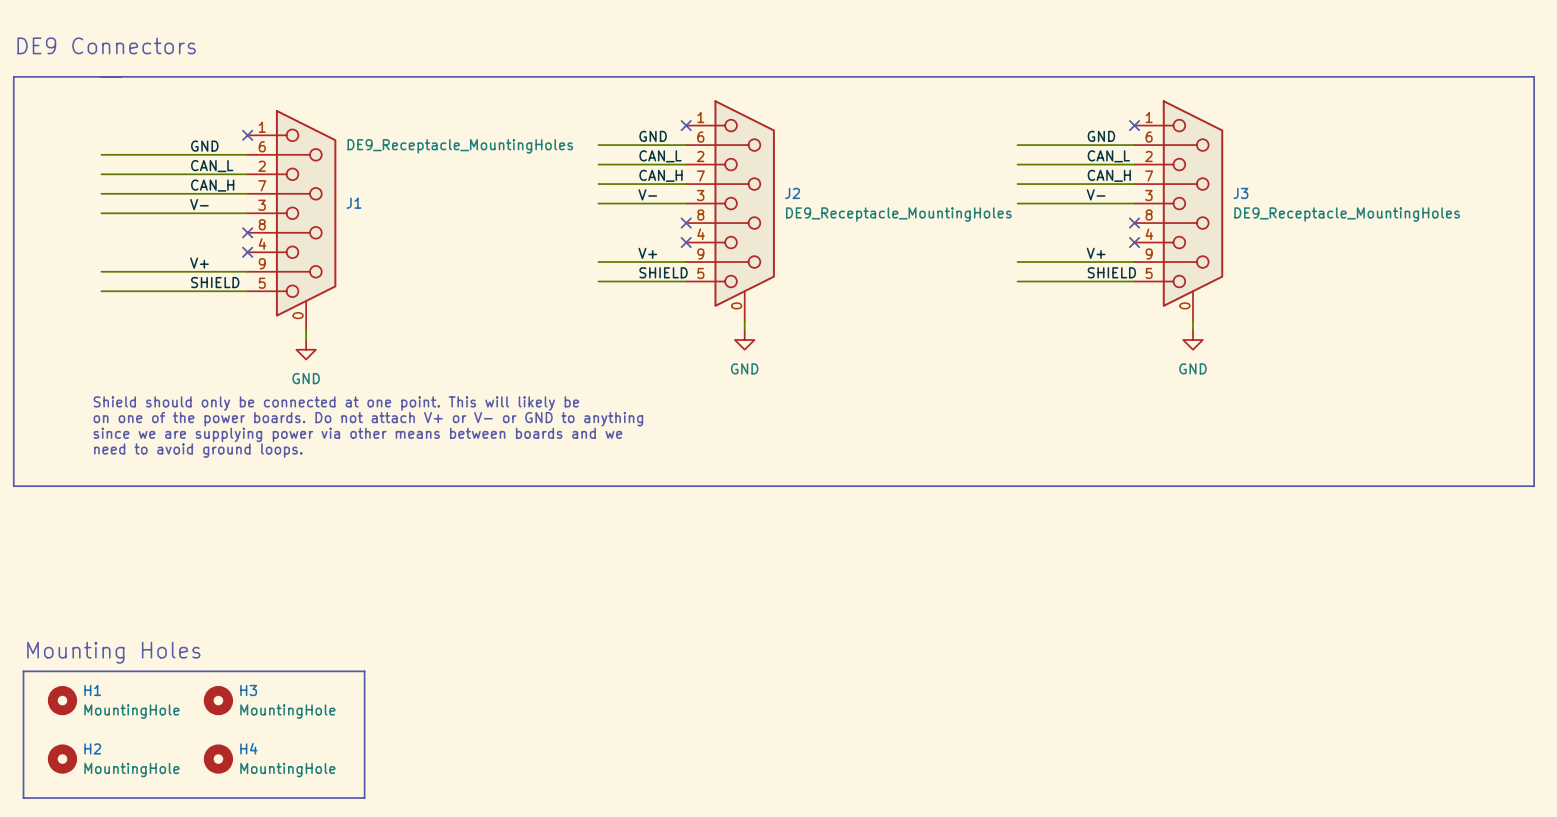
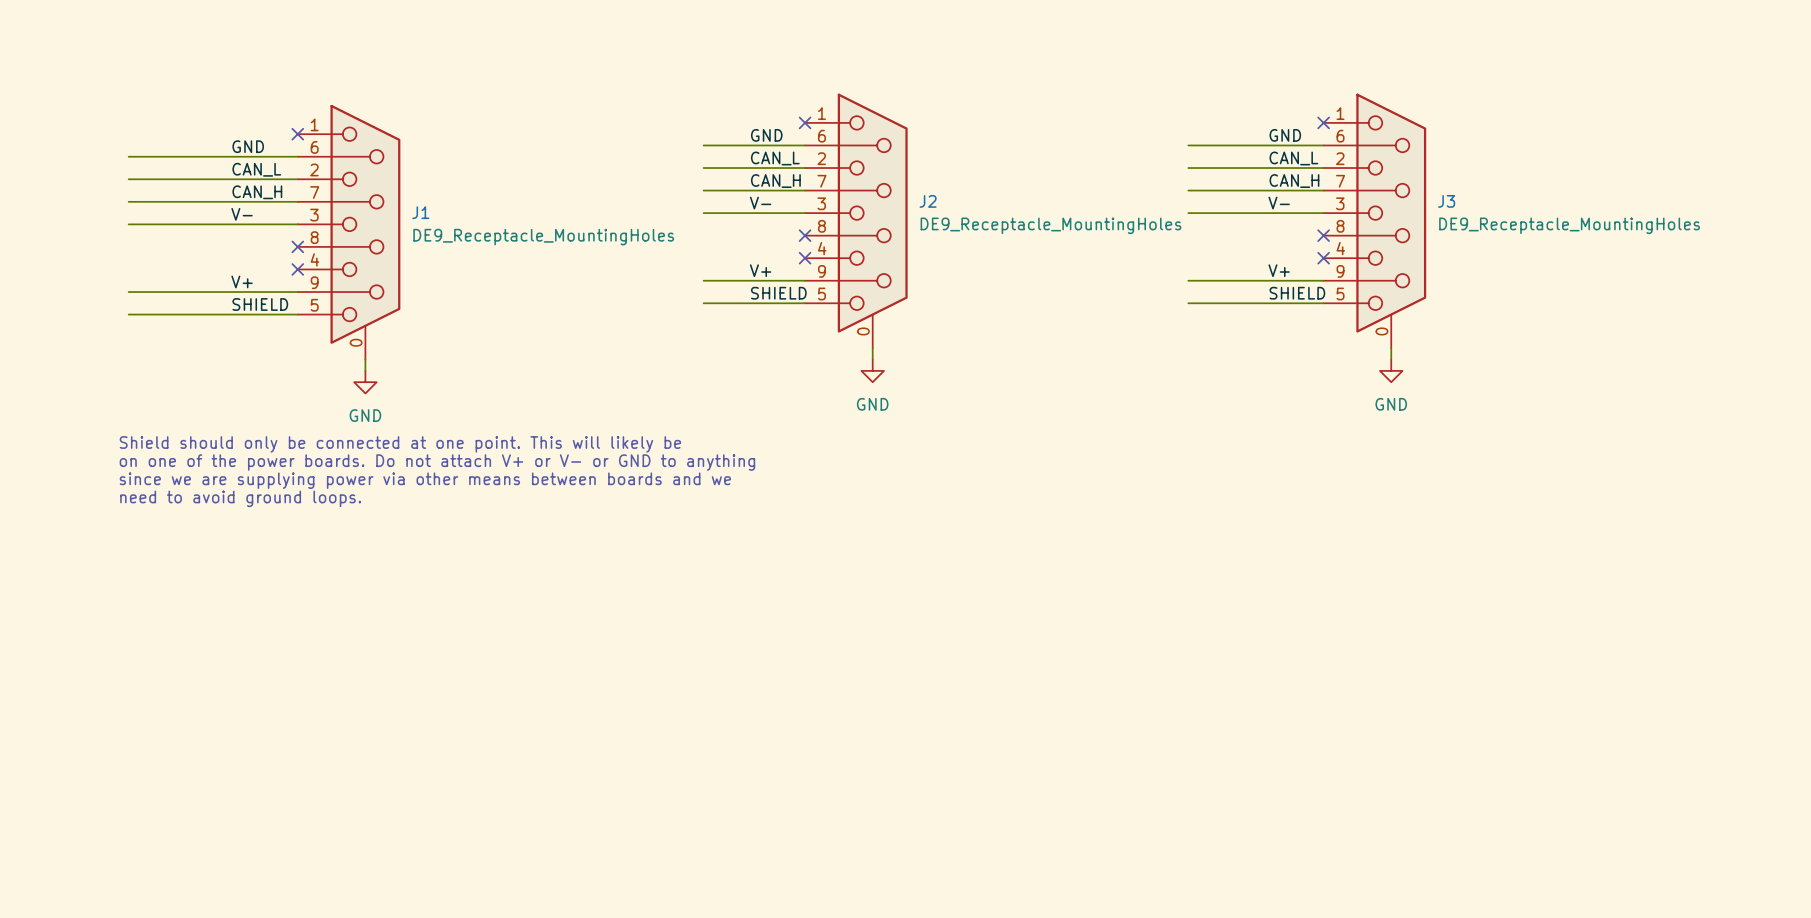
text: DE9 Connectors (106, 45) -> none
line: (13, 76) (1534, 76) (1534, 486) (13, 486) (13, 76) -> none
J1 value position: DE9_Receptacle_MountingHoles (460, 146) -> DE9_Receptacle_MountingHoles (543, 237)
text: Mounting Holes (113, 652) -> none
line: (23, 671) (23, 798) (364, 798) (364, 671) (23, 671) -> none
H1: MountingHole (62, 700) -> none
H3: MountingHole (218, 700) -> none
H2: MountingHole (62, 759) -> none
H4: MountingHole (218, 759) -> none

